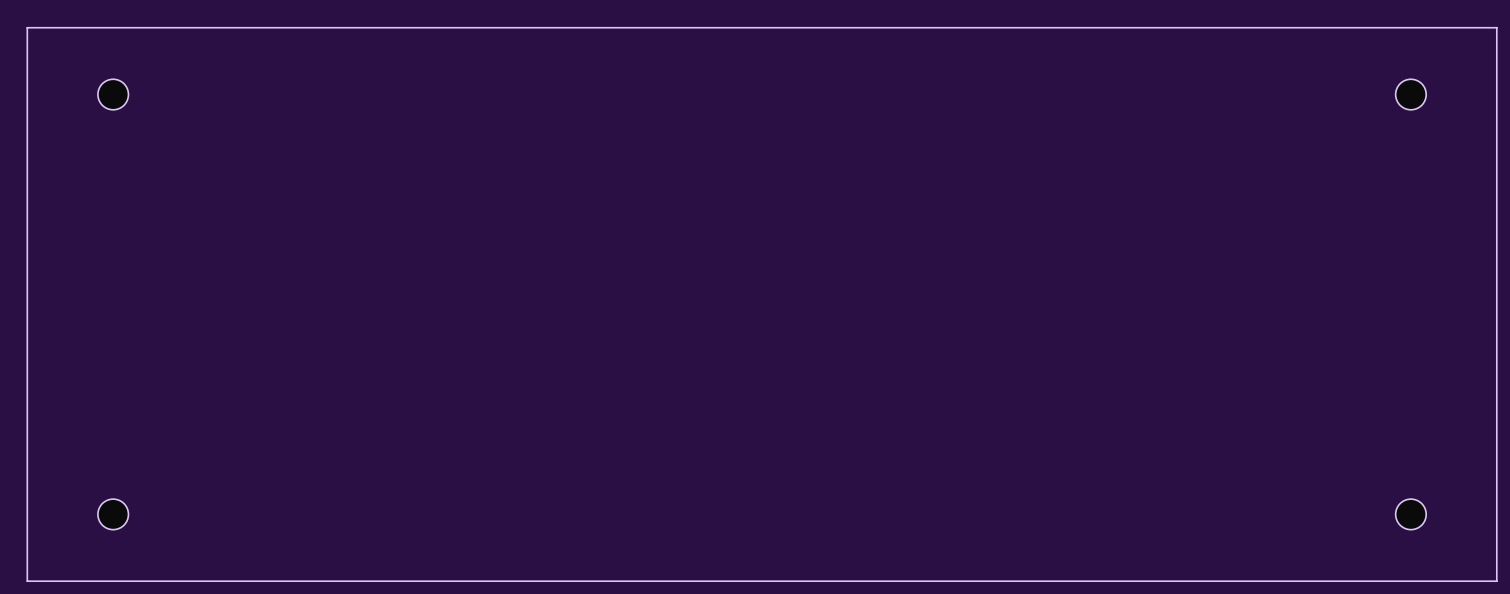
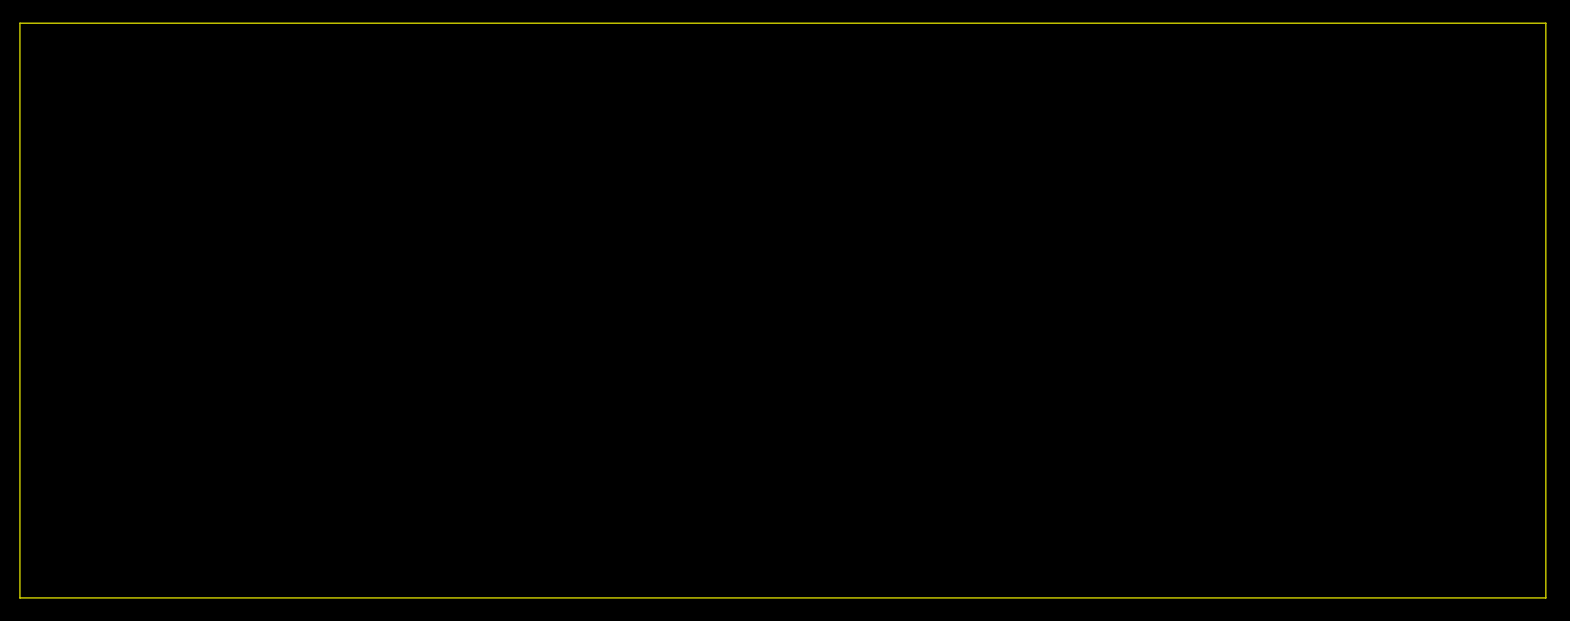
part: (113, 94) -> none
part: (1410, 94) -> none
part: (113, 514) -> none
part: (1410, 514) -> none

